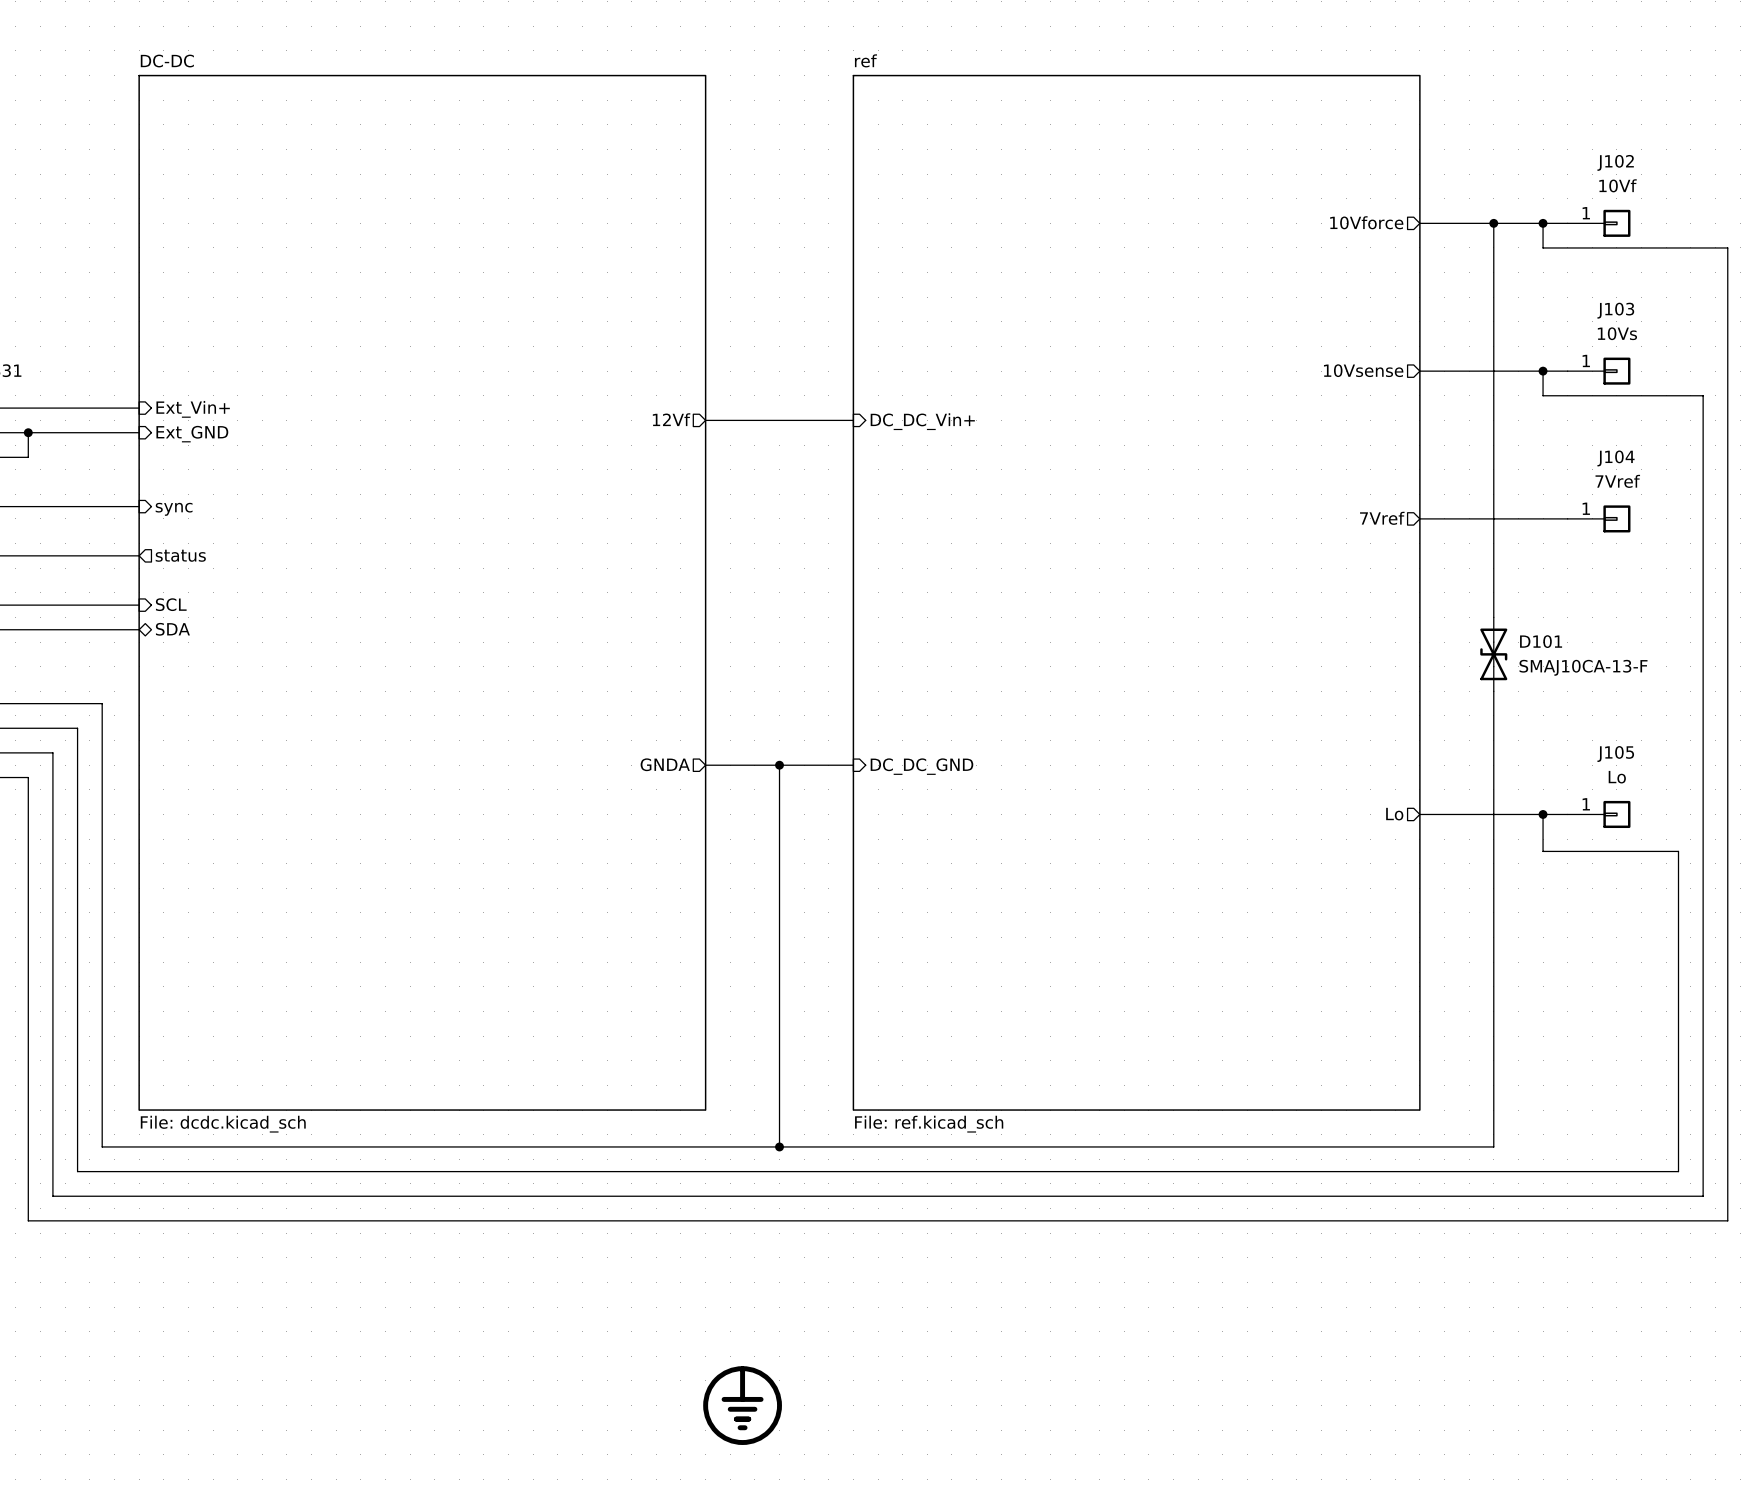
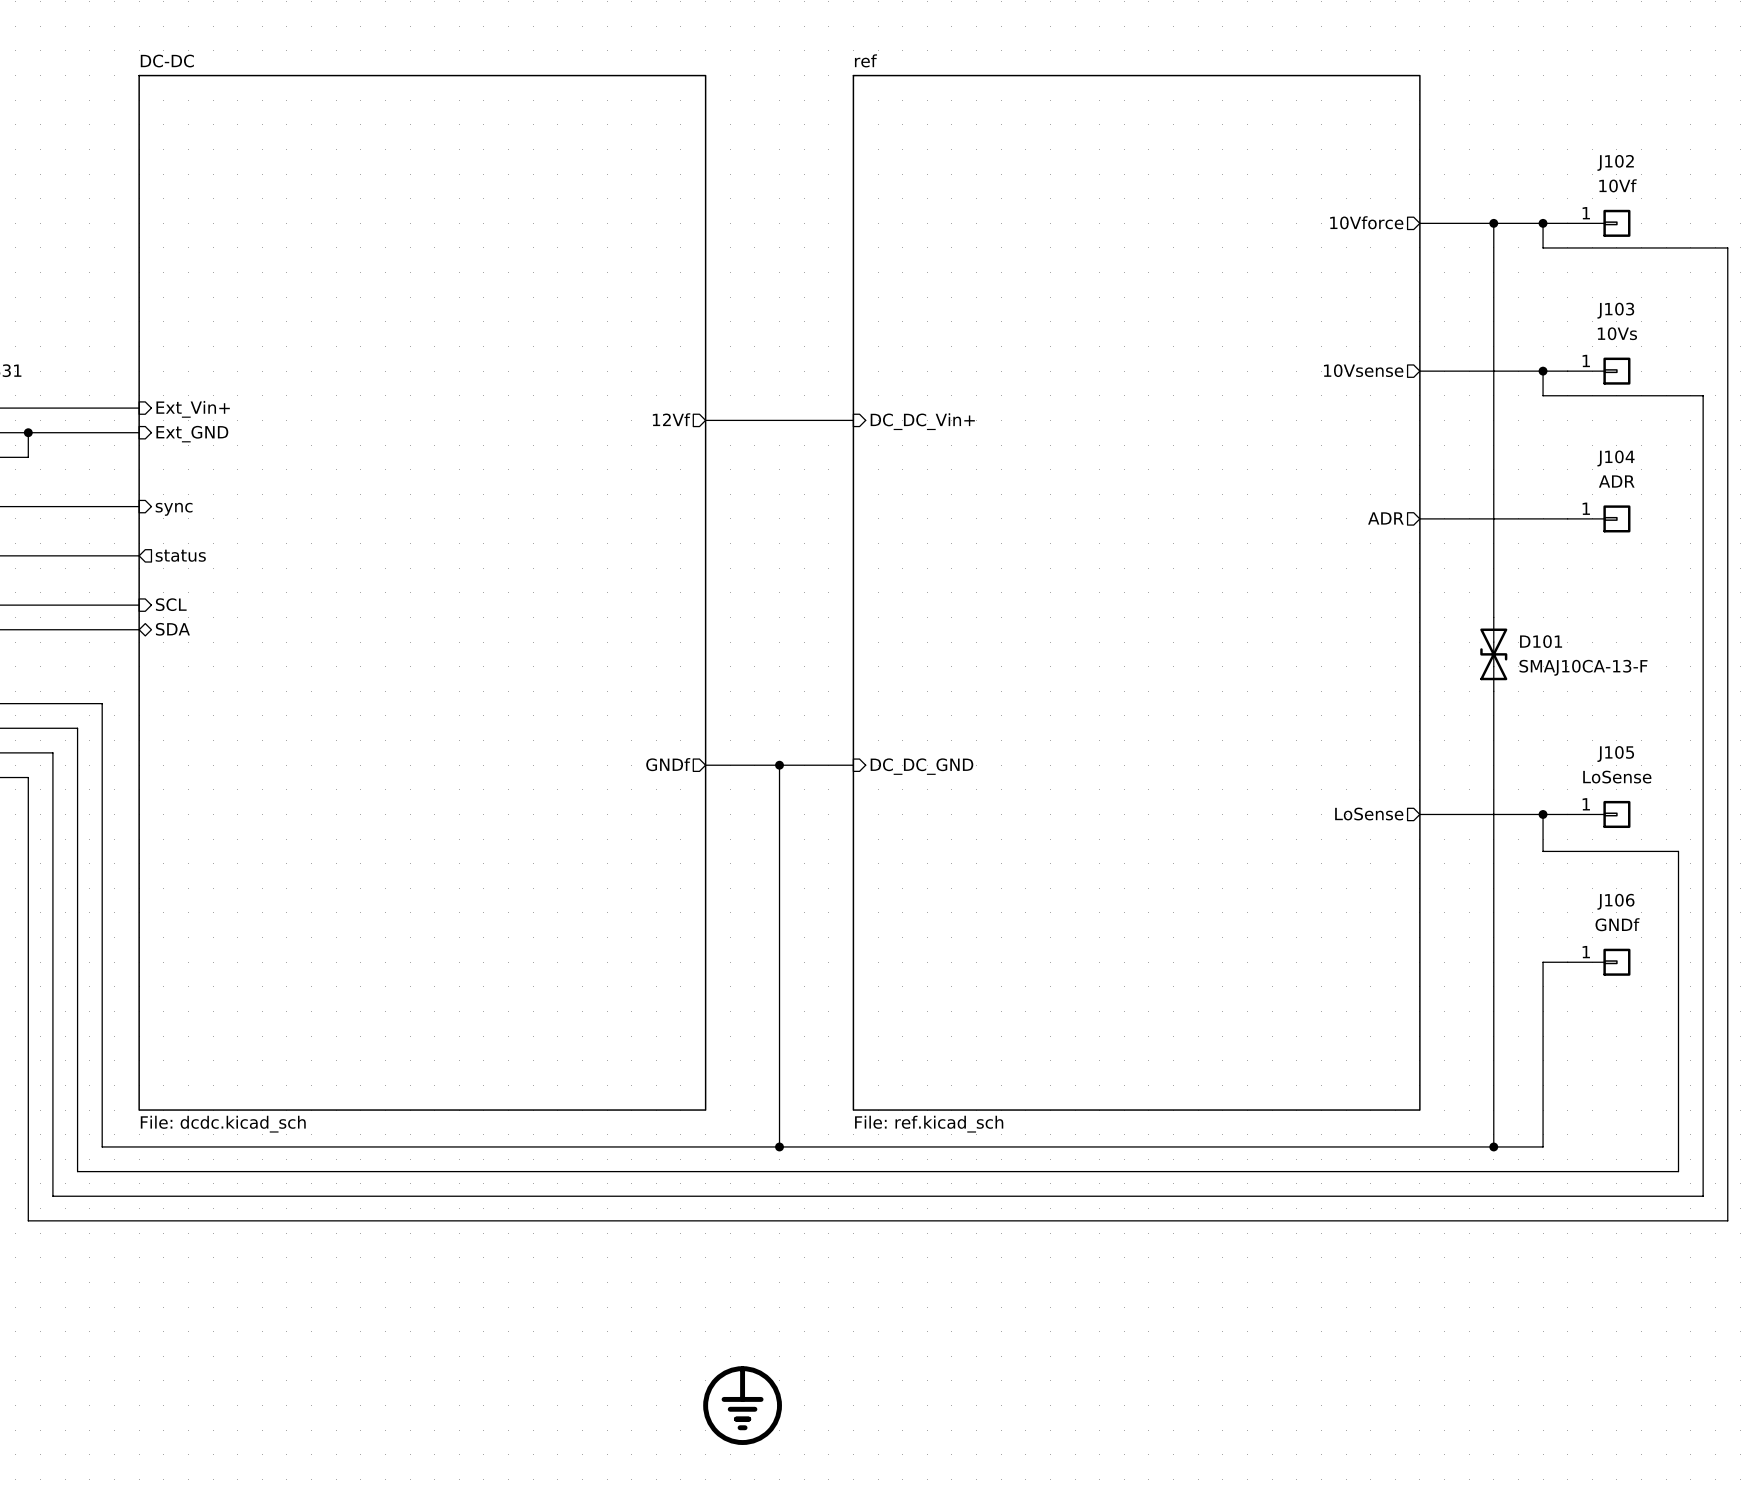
J104 value: 7Vref (1617, 481) -> ADR (1616, 481)
sheet pin: 7Vref (1382, 518) -> ADR (1385, 518)
sheet pin: GNDA (665, 764) -> GNDf (668, 764)
J105 value: Lo (1617, 777) -> LoSense (1617, 777)
sheet pin: Lo (1394, 814) -> LoSense (1369, 814)
wire: none -> (1567, 962) (1543, 962) (1543, 1146) (1493, 1146)
J106: none -> GNDf (1599, 962)
junction: none -> (1493, 1146)

